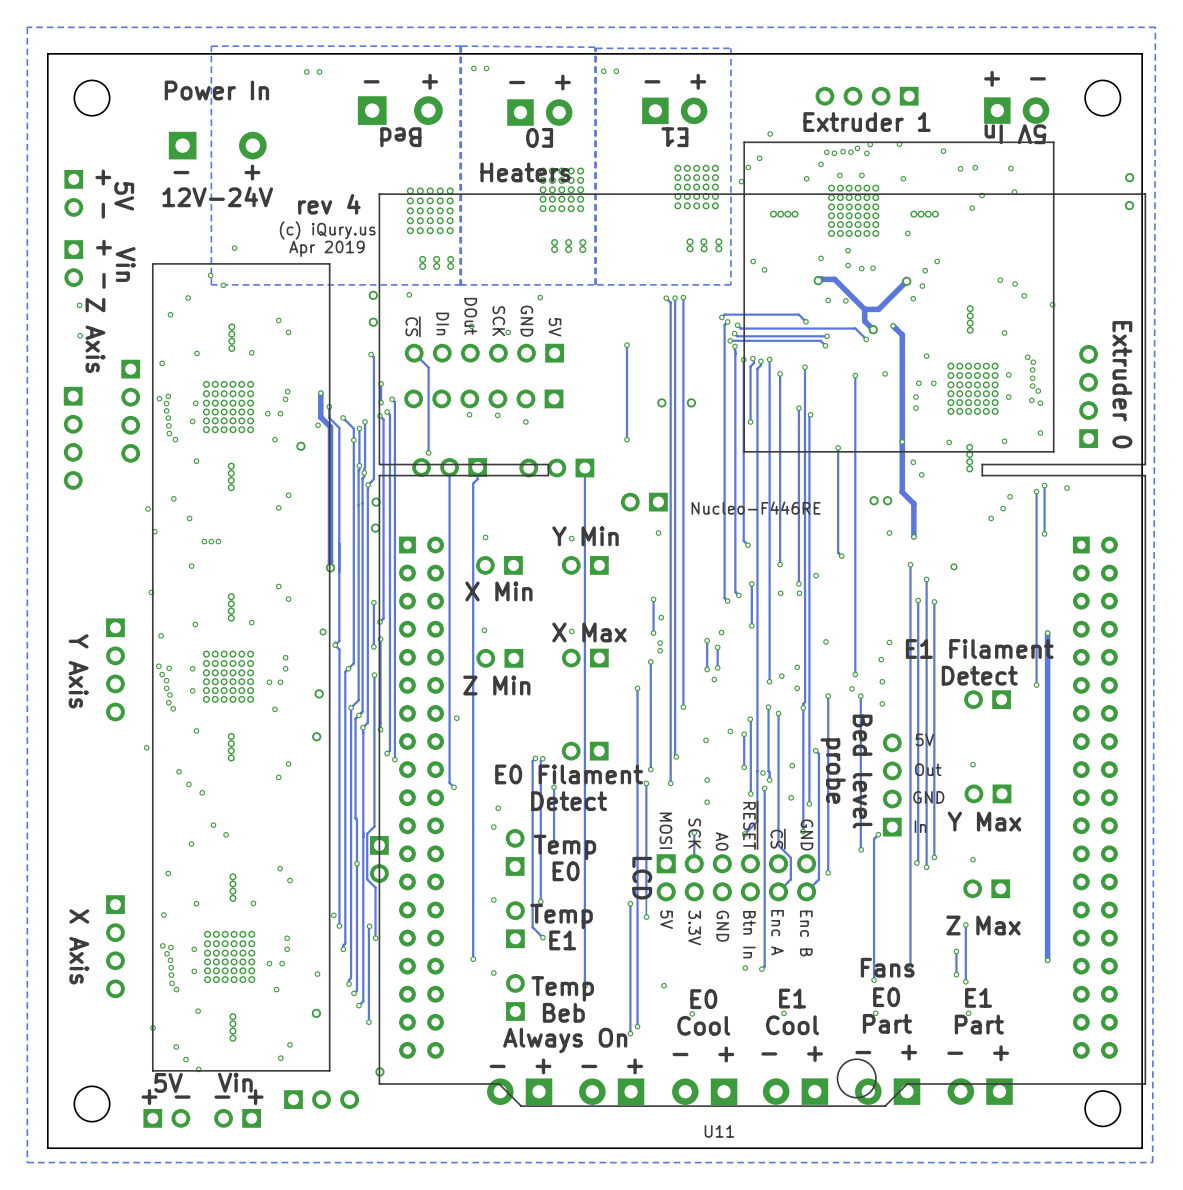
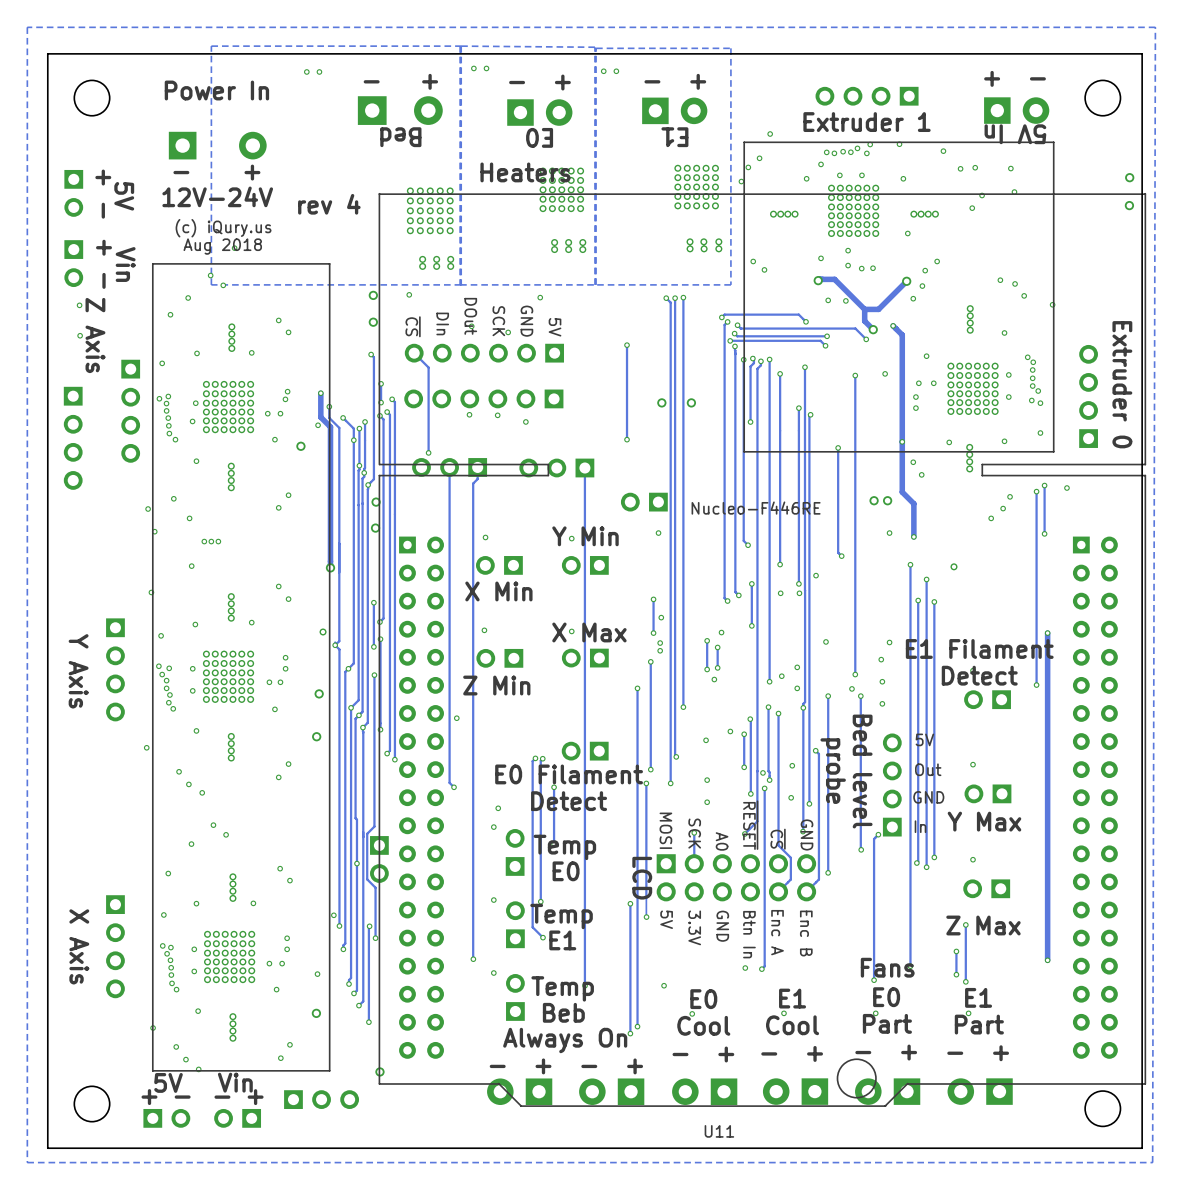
text position: (c) iQury.us (327, 230) -> (c) iQury.us (223, 228)
text: none -> Aug 2018 (222, 246)
text: Apr 2019 (326, 248) -> none

